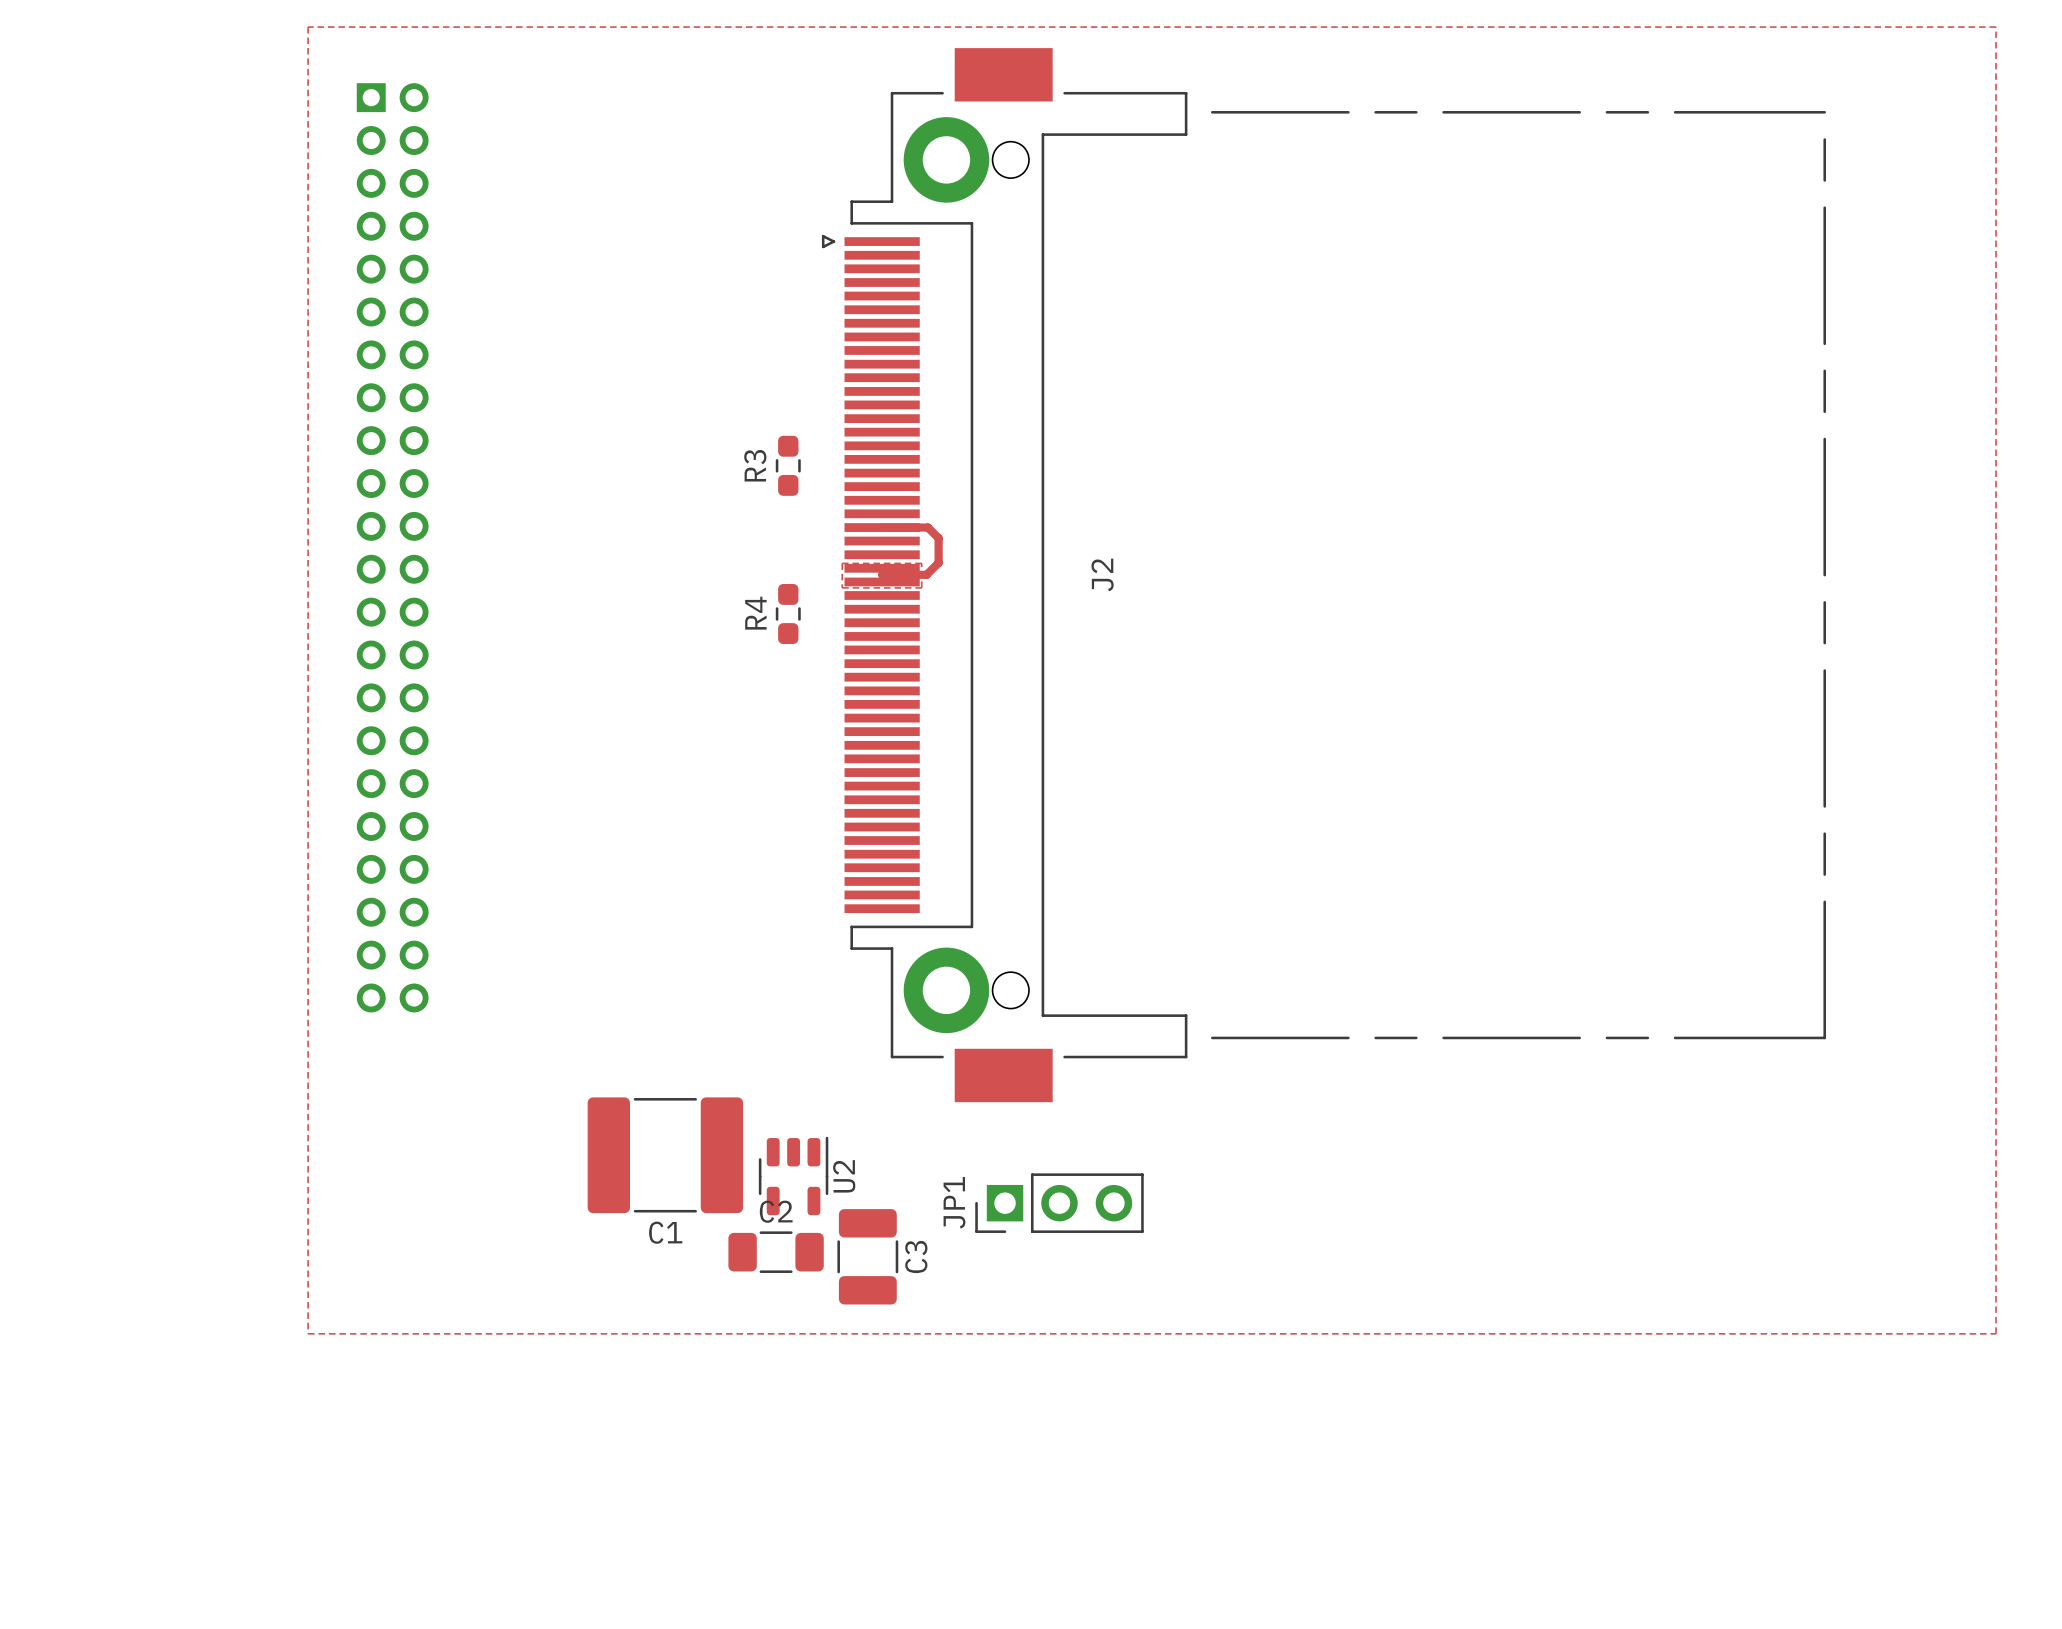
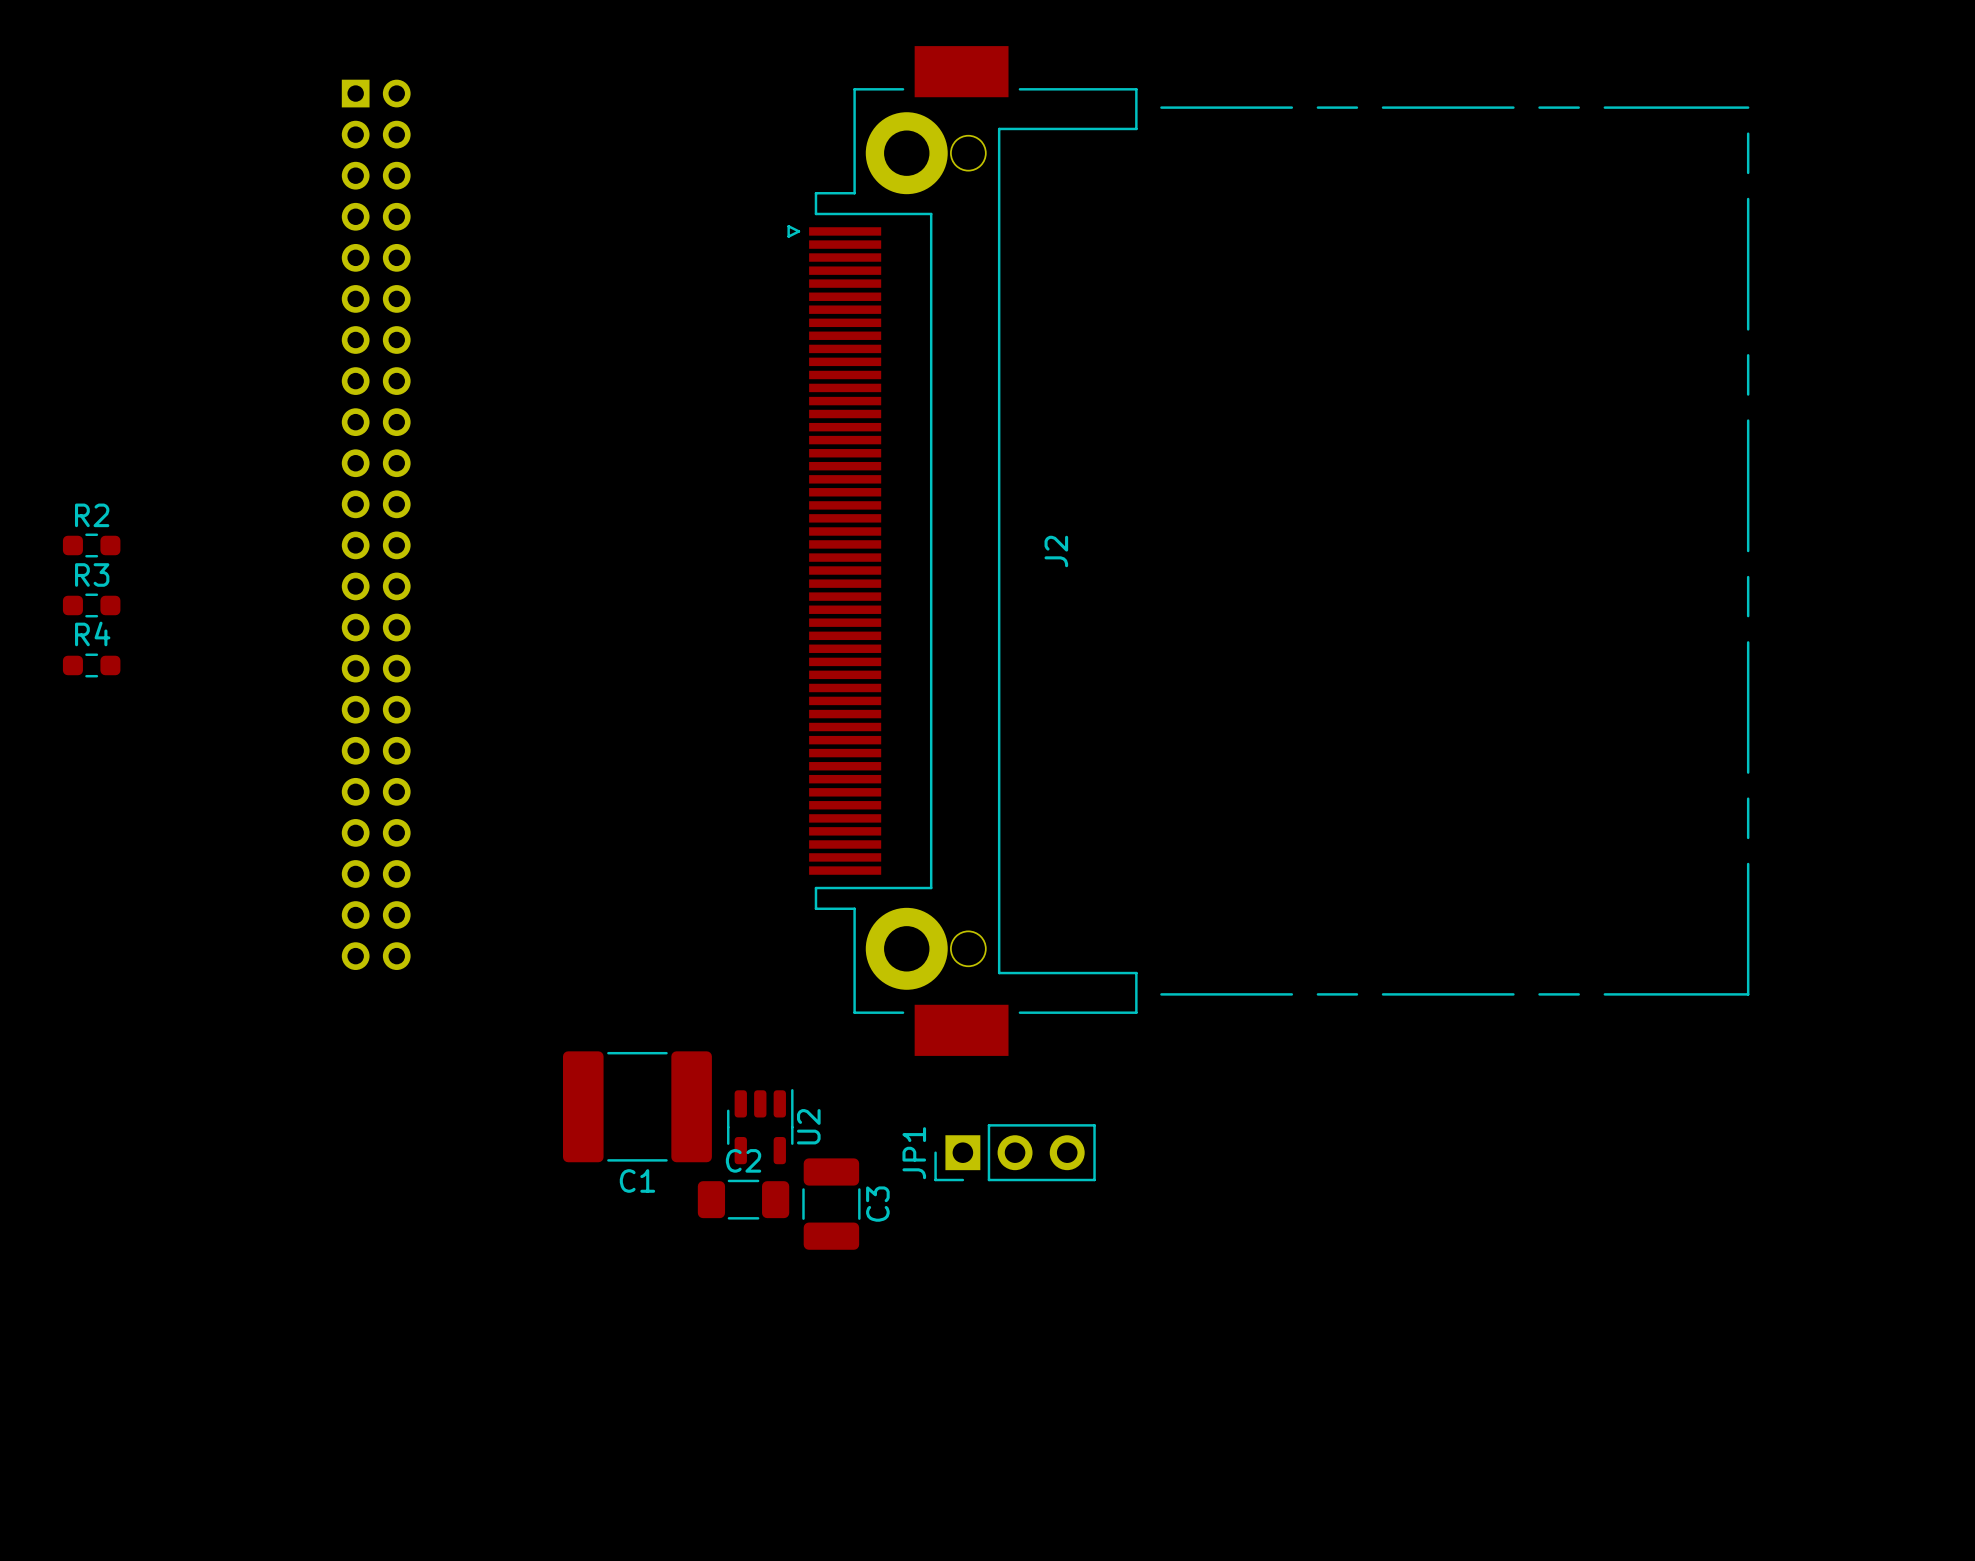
top zone outline: (308, 27) (308, 1333) (1996, 1333) (1996, 27) (308, 27) -> none
R3 rotation: 0° (788, 465) -> 90° clockwise (91, 605)
R3 position: (788, 465) -> (91, 605)
top track: (882, 527) (927, 527) (938, 538) (938, 562) (926, 574) (881, 574) -> none
top zone outline: (842, 563) (842, 587) (921, 587) (921, 563) (842, 563) -> none
R2: none -> (91, 545)
R4 rotation: 0° (788, 614) -> 90° clockwise (91, 665)
R4 position: (788, 614) -> (91, 665)

